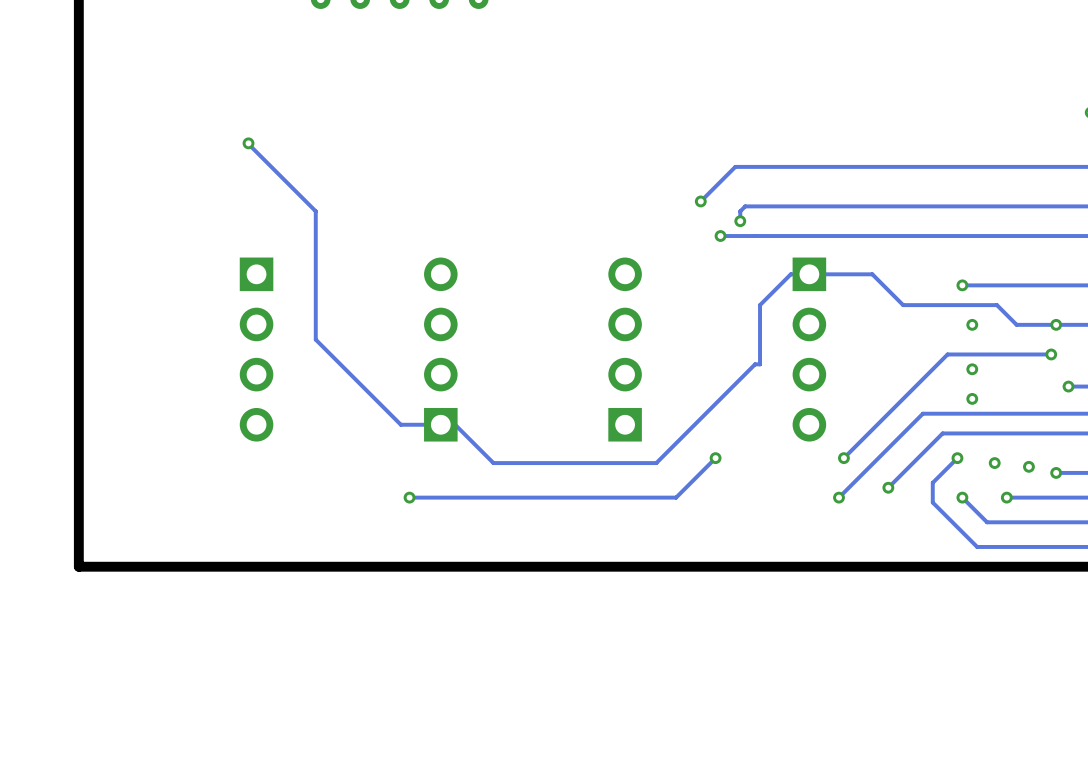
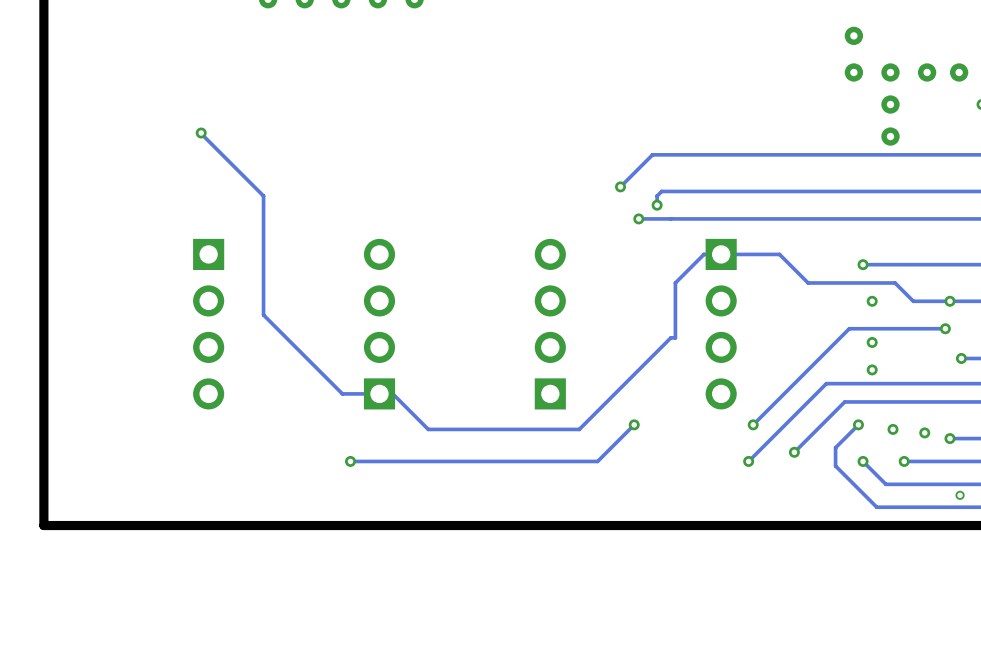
via: none -> (853, 35)
via: none -> (853, 72)
via: none -> (890, 72)
via: none -> (927, 72)
via: none -> (959, 72)
via: none -> (890, 104)
via: none -> (890, 136)
via: none -> (960, 495)

